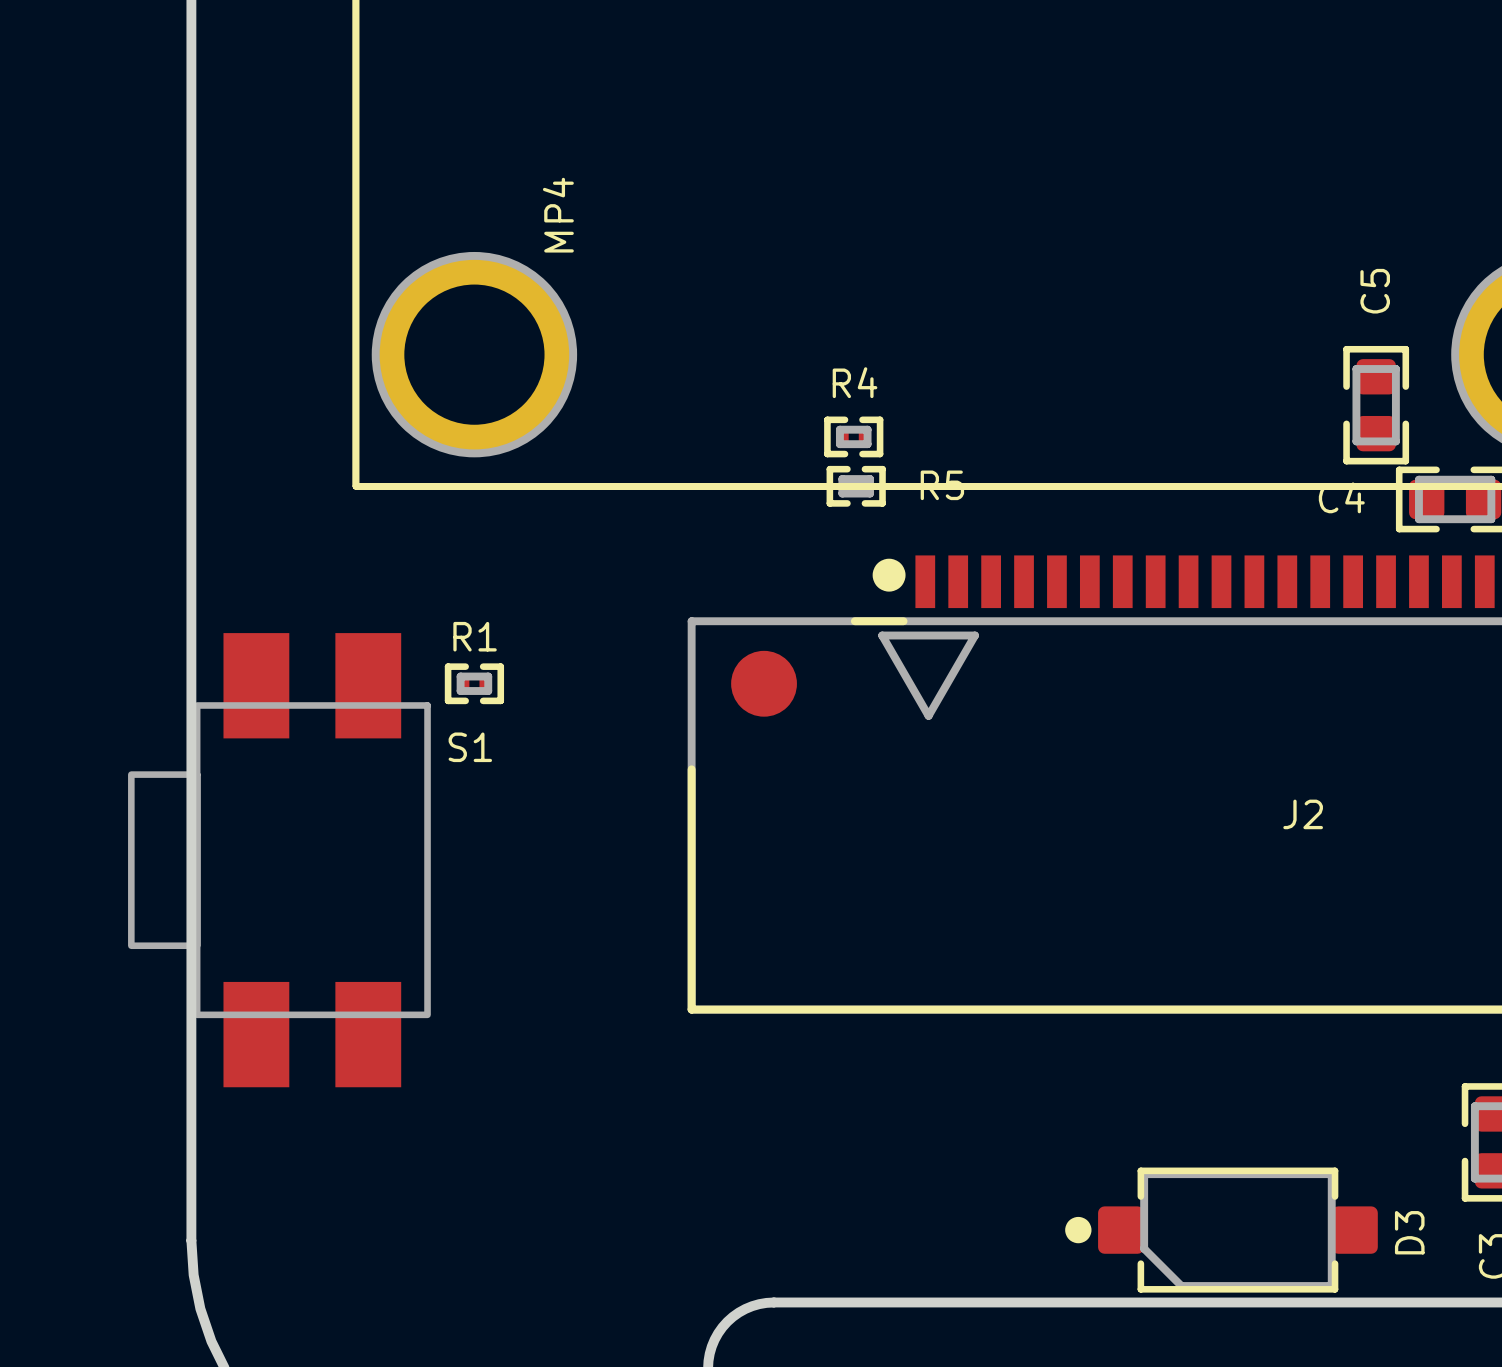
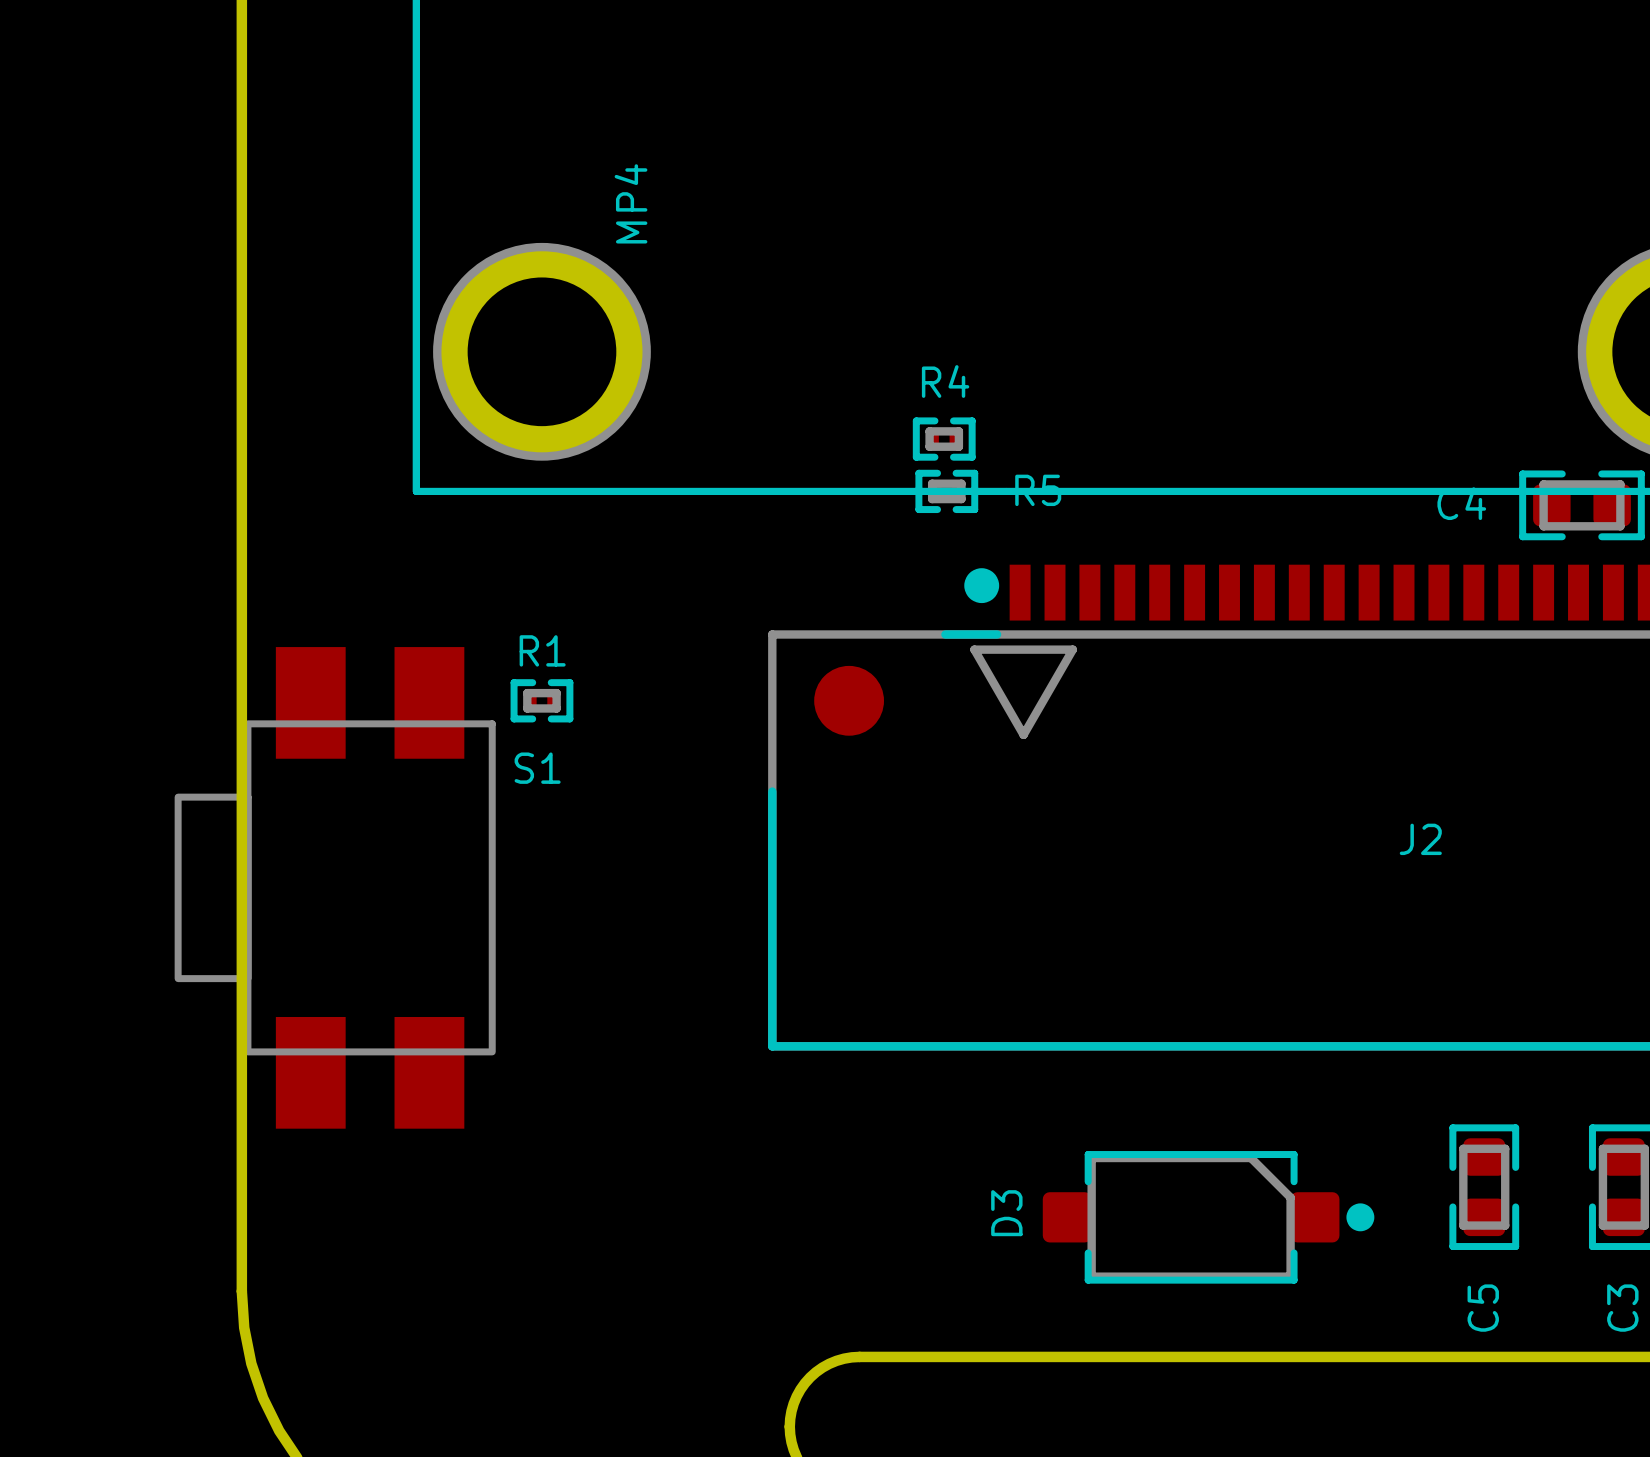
C5 name position: C5 (1375, 291) -> C5 (1483, 1308)
C5 position: (1376, 405) -> (1484, 1187)
D3 rotation: 0° (1221, 1230) -> 180° (1208, 1217)

